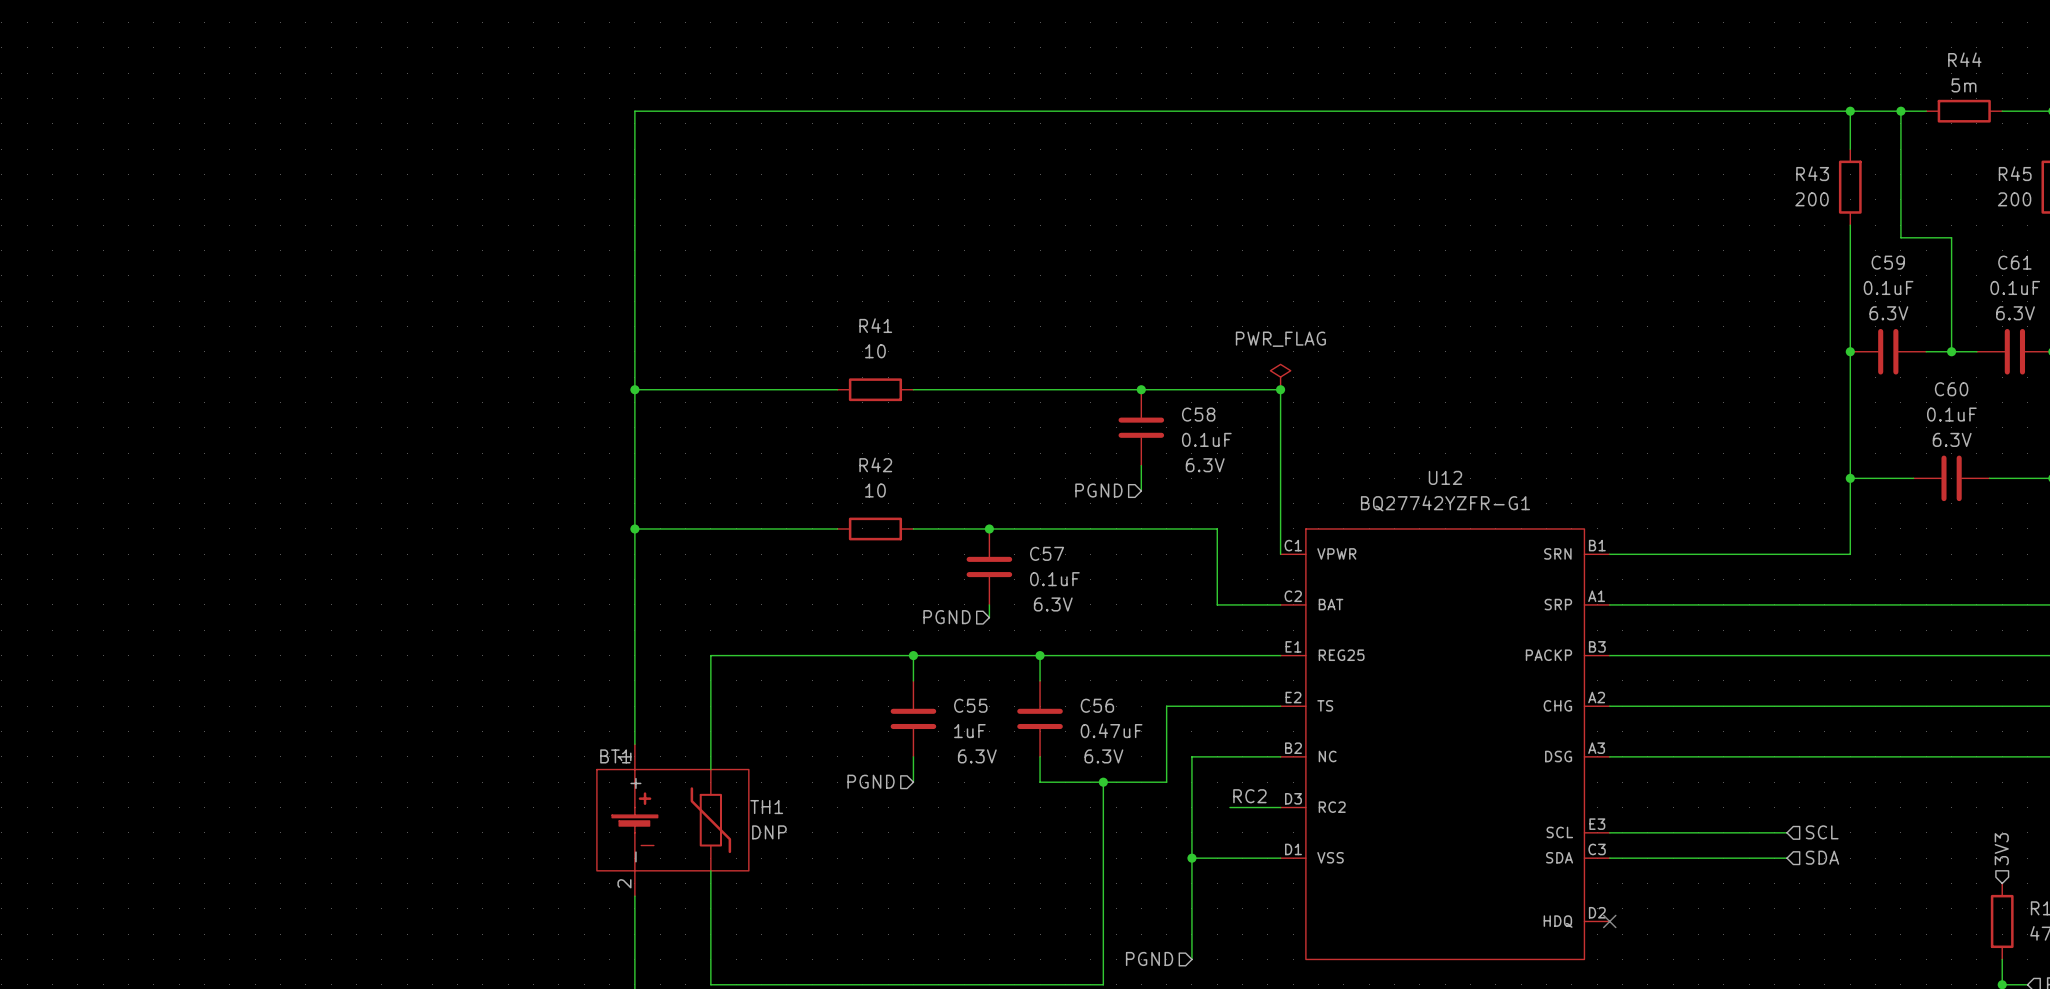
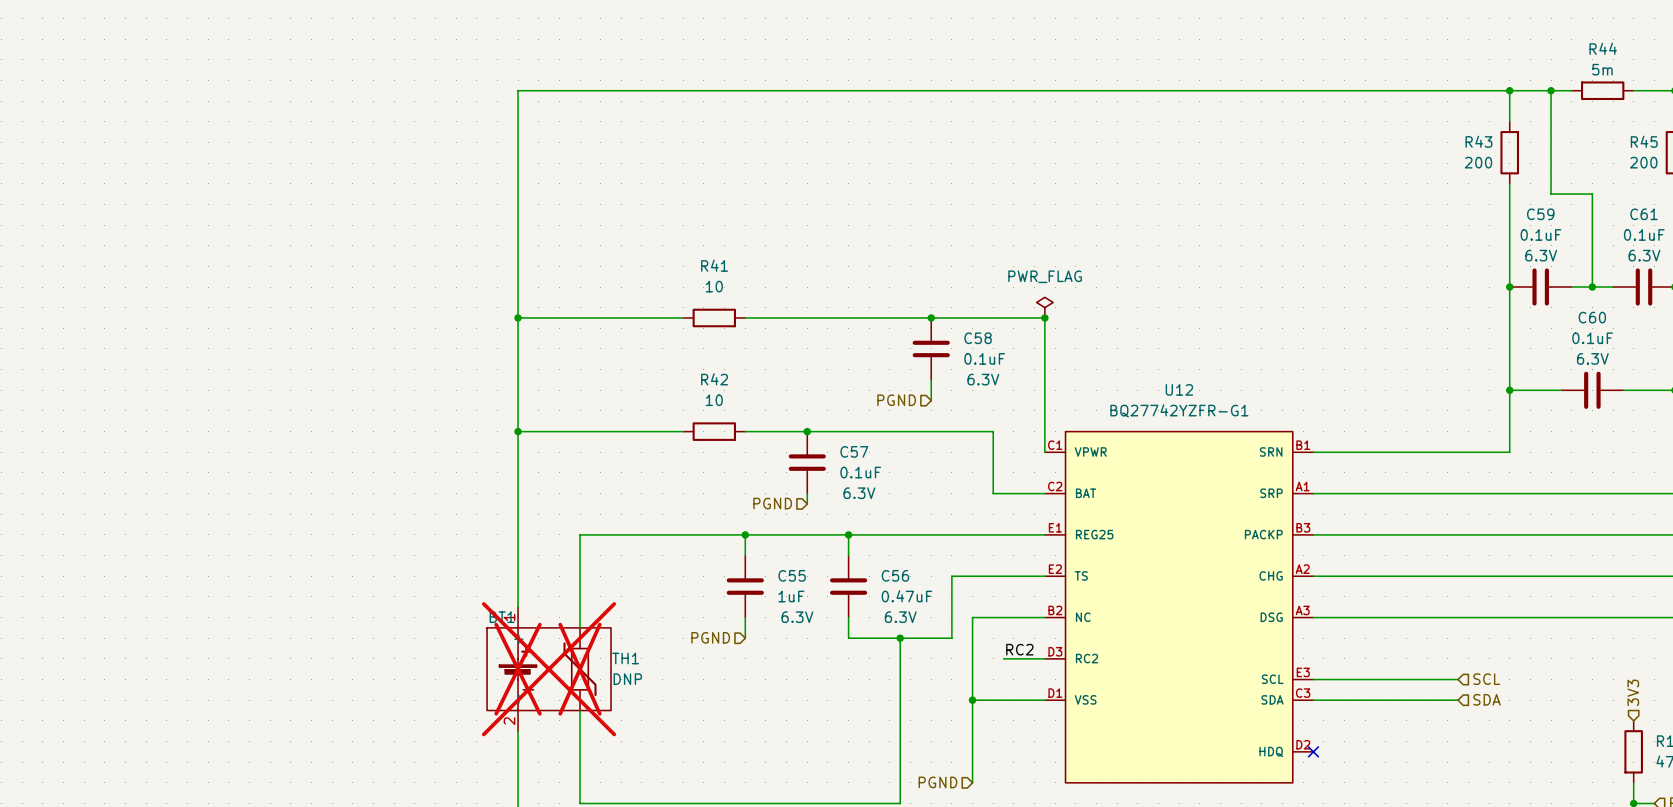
part do-not-place cross: none -> (518, 669)
BT1 do-not-place cross: none -> (549, 669)
TH1 do-not-place cross: none -> (580, 669)

